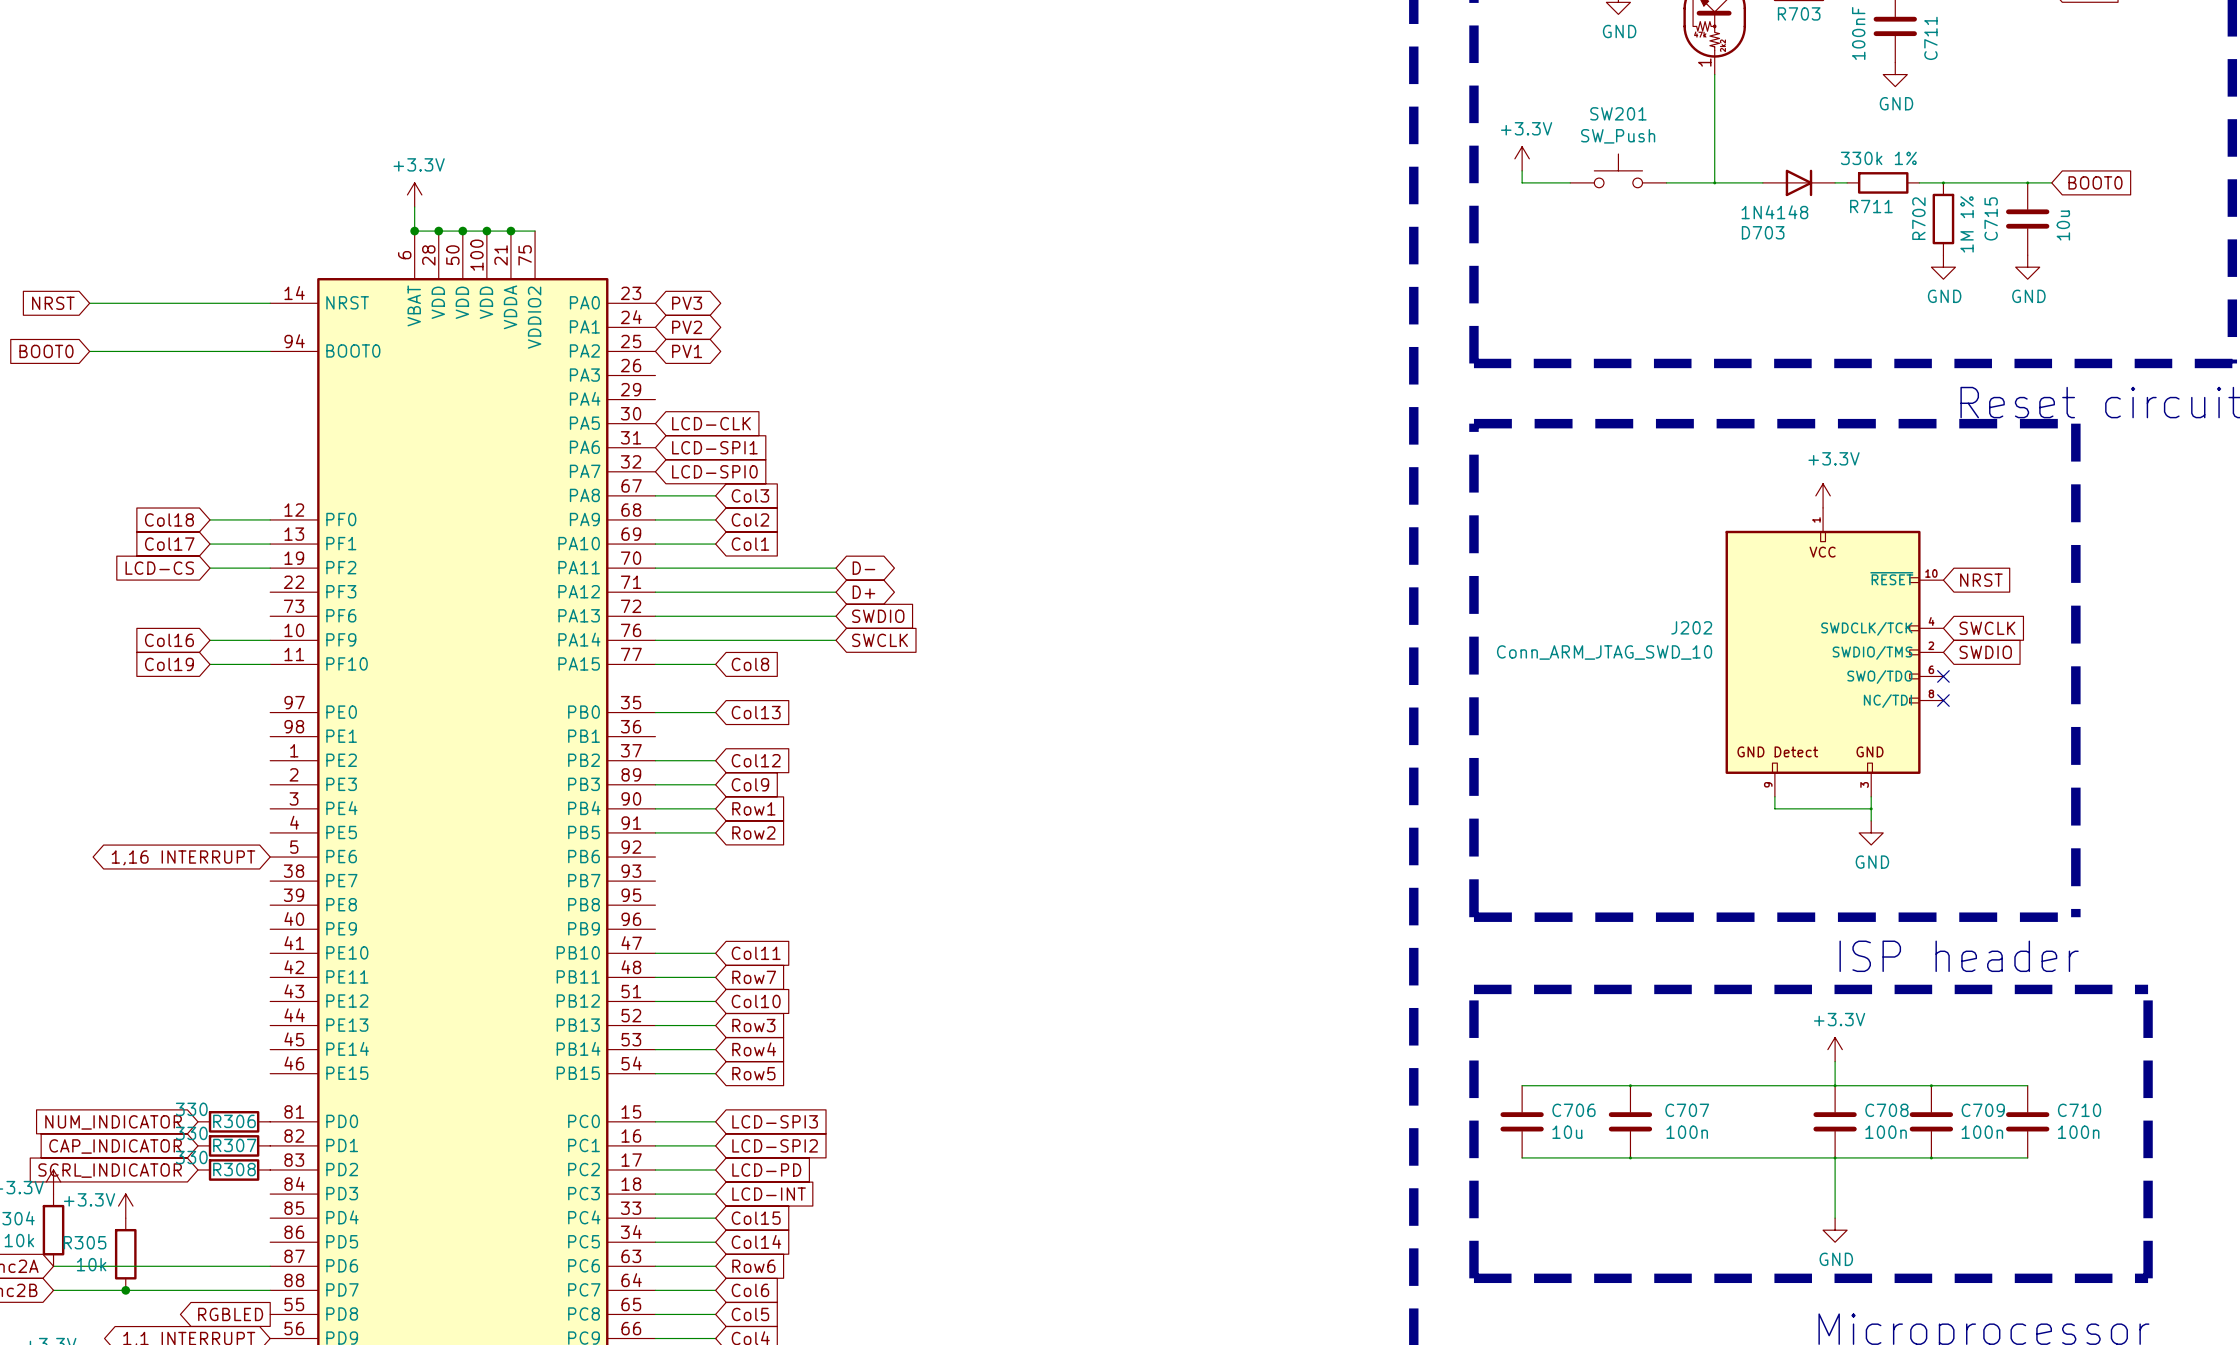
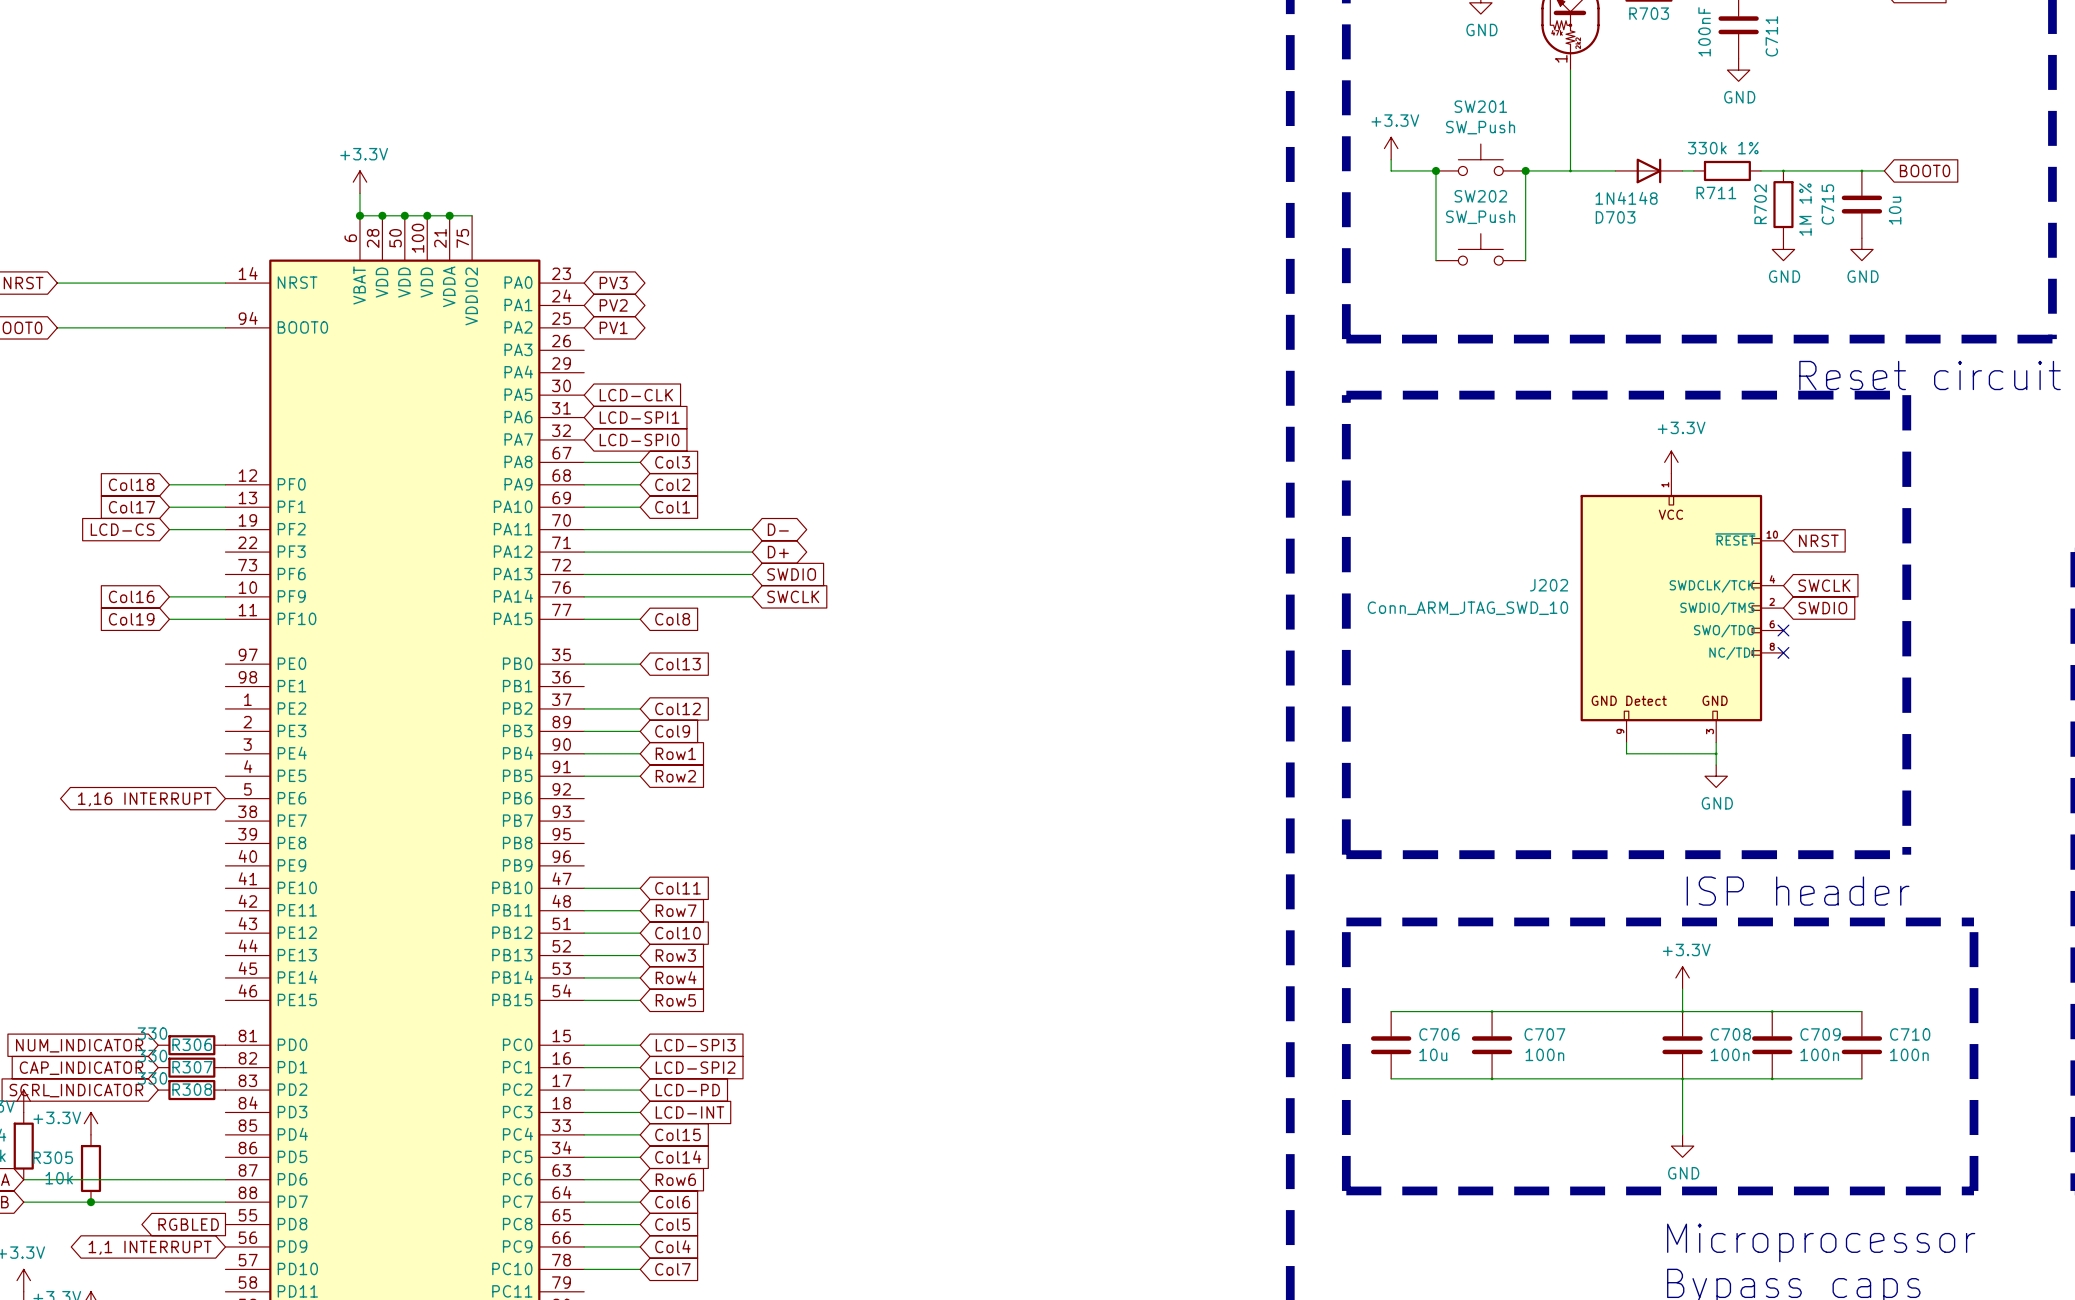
wire: none -> (1435, 170) (1435, 260)
junction: none -> (1435, 170)
wire: none -> (1525, 170) (1525, 260)
junction: none -> (1525, 170)
SW202: none -> SW_Push (1480, 249)

